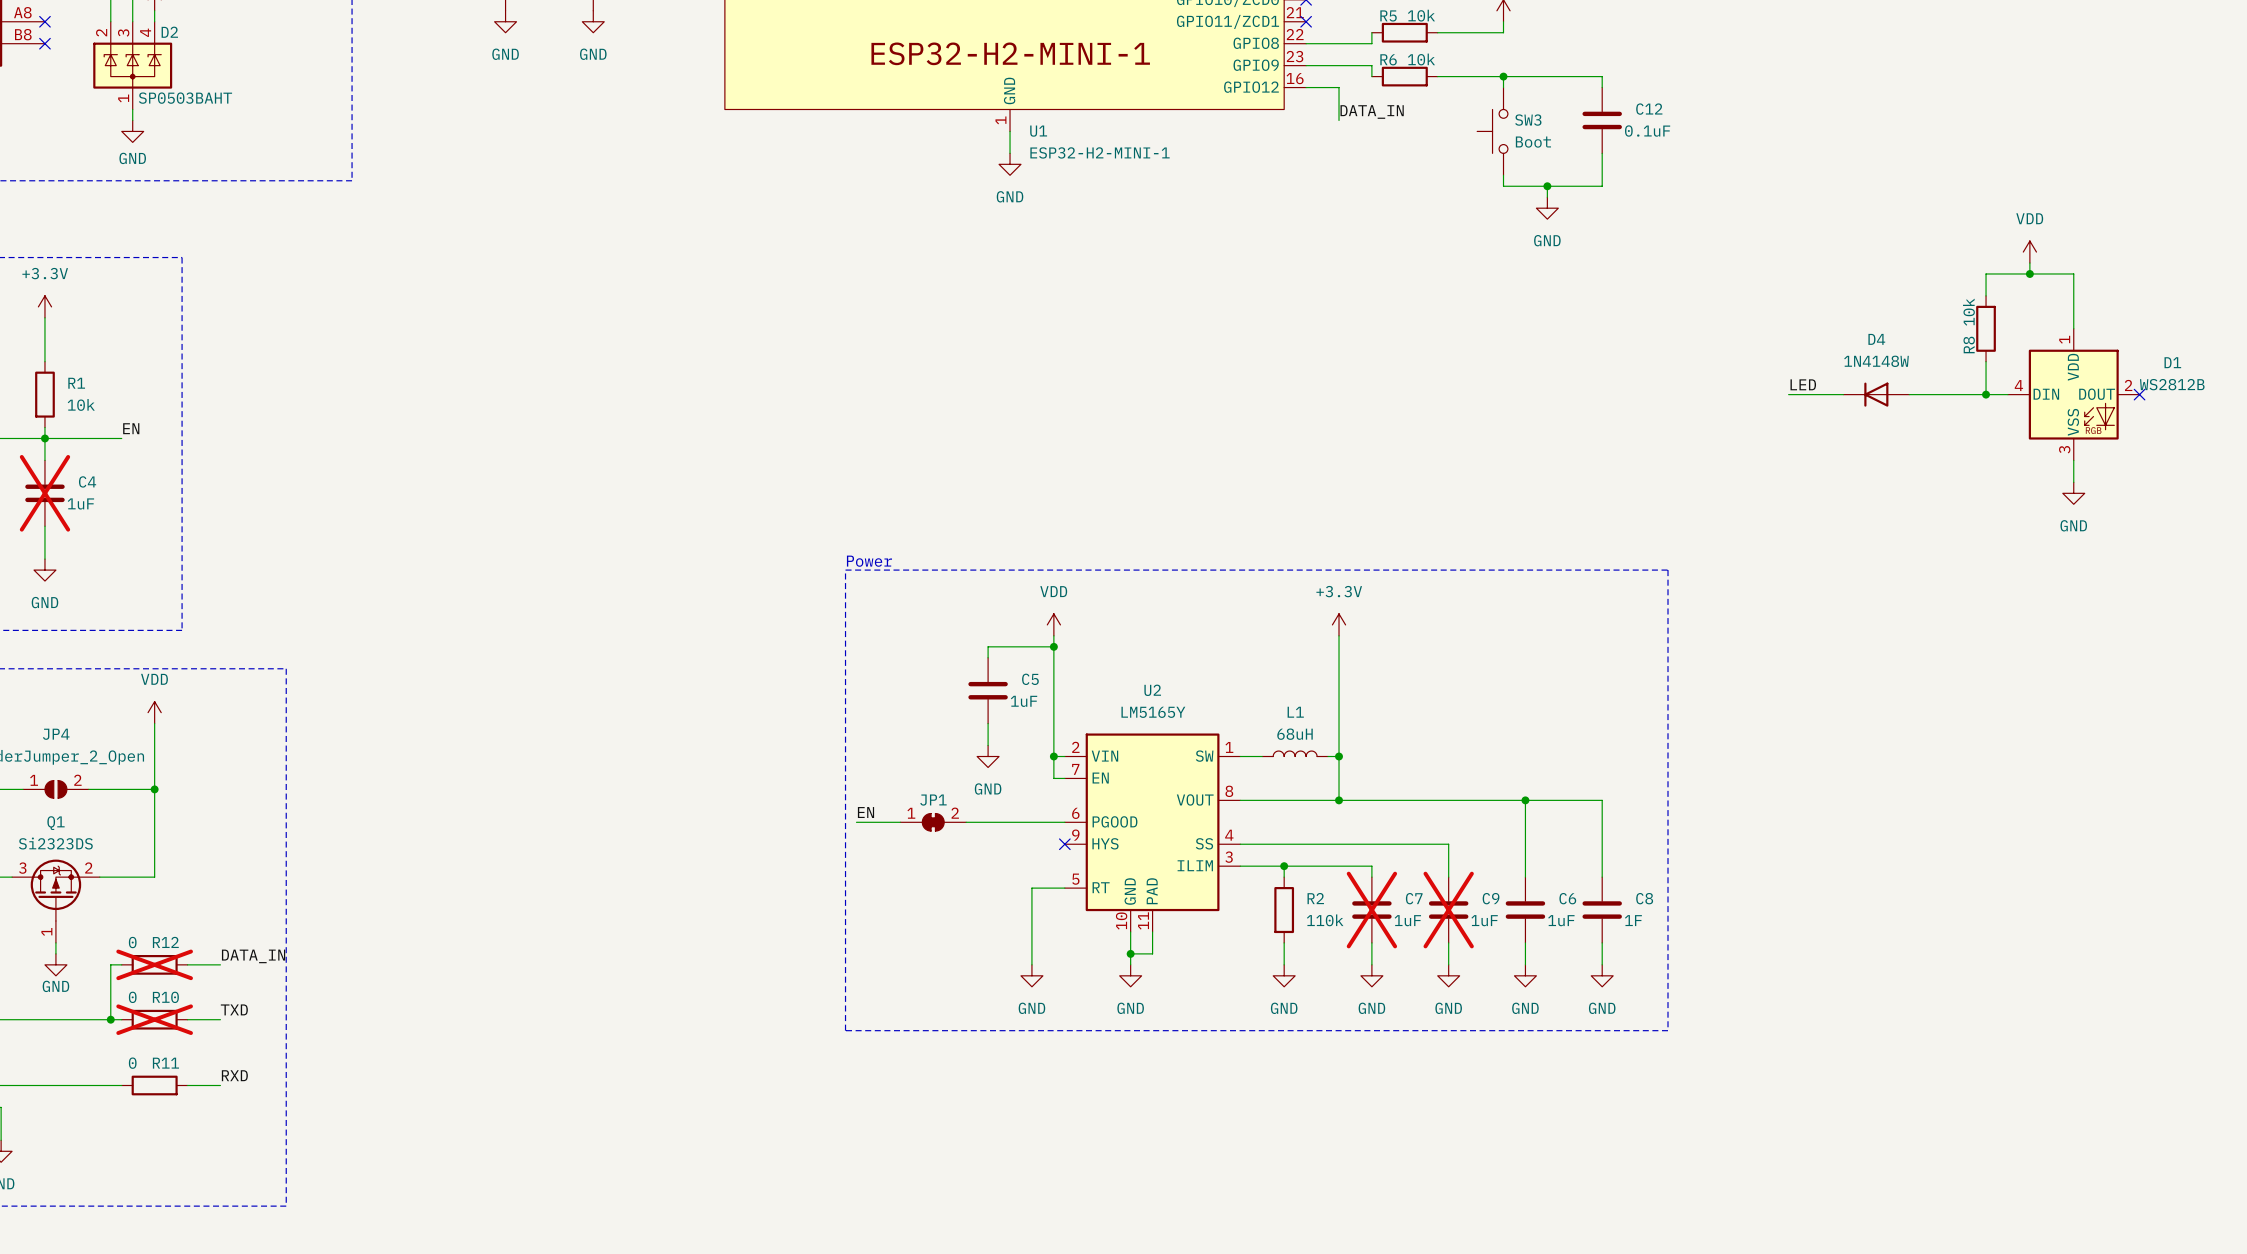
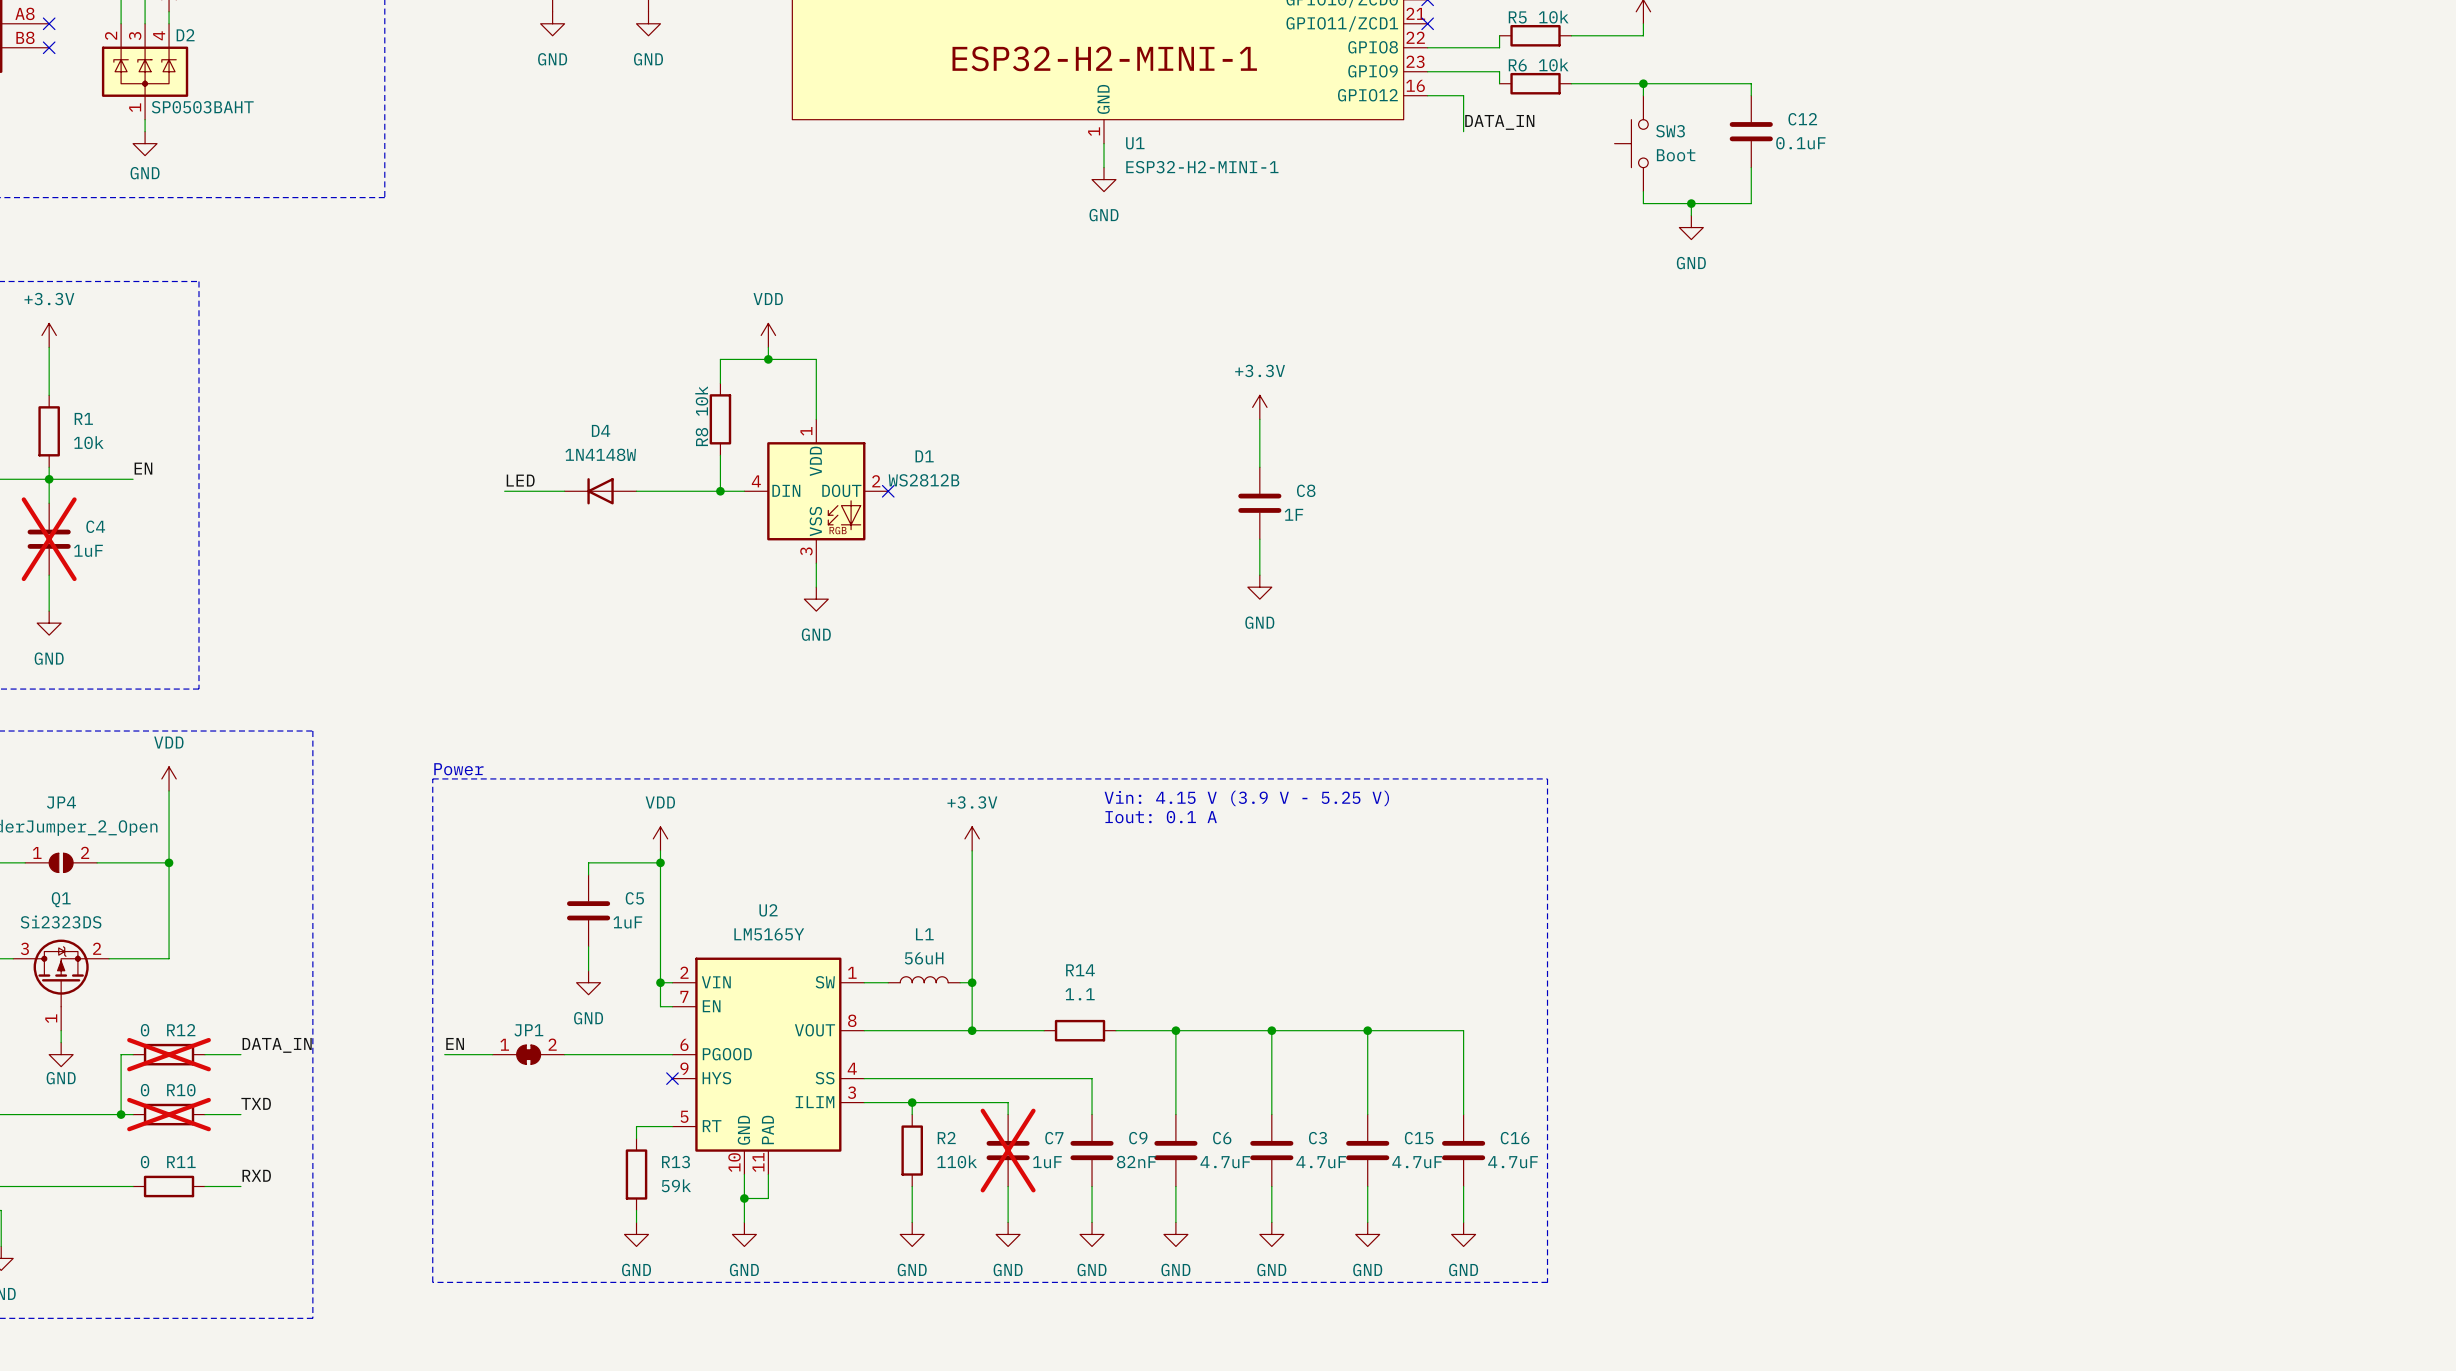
power symbol: VDD (2029, 252) -> none
wire: (2029, 263) (2029, 273) -> none
junction: (2029, 273) -> none
wire: (1986, 295) (1986, 273) (2073, 273) (2073, 328) -> none
power symbol: none -> VDD (768, 335)
wire: none -> (768, 347) (768, 359)
junction: none -> (768, 359)
R8 position: (1986, 328) -> (720, 419)
wire: none -> (720, 383) (720, 359) (816, 359) (816, 419)
wire: (1986, 361) (1986, 394) -> none
power symbol: none -> +3.3V (1259, 407)
wire: none -> (1259, 419) (1259, 467)
label: LED (1803, 384) -> none
wire: (1788, 394) (1843, 394) -> none
D4 position: (1876, 394) -> (600, 491)
wire: (1909, 394) (2007, 394) -> none
junction: (1986, 394) -> none
D1 position: (2073, 394) -> (816, 491)
no-connect mark: (2139, 394) -> none
wire: none -> (720, 455) (720, 491)
label: none -> LED (520, 480)
wire: none -> (504, 491) (564, 491)
wire: none -> (636, 491) (744, 491)
junction: none -> (720, 491)
no-connect mark: none -> (888, 491)
wire: (2073, 460) (2073, 482) -> none
wire: none -> (1259, 539) (1259, 575)
power symbol: GND (2073, 493) -> none
wire: none -> (816, 563) (816, 587)
power symbol: none -> GND (1259, 587)
power symbol: none -> GND (816, 599)
text: Power (869, 561) -> none
line: (845, 570) (1668, 570) (1668, 1030) (845, 1030) (845, 570) -> none
power symbol: VDD (1053, 624) -> none
power symbol: +3.3V (1339, 624) -> none
wire: (1053, 635) (1053, 778) (1064, 778) -> none
wire: (1339, 635) (1339, 800) -> none
wire: (1053, 646) (988, 646) (988, 657) -> none
junction: (1053, 646) -> none
C5 position: (988, 690) -> (588, 910)
text: none -> Power (458, 769)
line: none -> (432, 778) (1547, 778) (1547, 1282) (432, 1282) (432, 778)
wire: (988, 723) (988, 745) -> none
text: none -> Vin: 4.15 V (3.9 V - 5.25 V) (1246, 798)
L1 value: 68uH (1295, 734) -> 56uH (924, 958)
text: none -> Iout: 0.1 A (1161, 817)
L1 position: (1295, 753) -> (924, 979)
power symbol: GND (988, 756) -> none
wire: (1053, 756) (1064, 756) -> none
junction: (1053, 756) -> none
wire: (1240, 756) (1262, 756) -> none
wire: (1328, 756) (1339, 756) -> none
junction: (1339, 756) -> none
power symbol: none -> VDD (660, 838)
power symbol: none -> +3.3V (972, 838)
wire: none -> (660, 850) (660, 1006) (672, 1006)
wire: none -> (972, 850) (972, 1030)
wire: none -> (660, 862) (588, 862) (588, 874)
junction: none -> (660, 862)
wire: (1240, 800) (1602, 800) (1602, 877) -> none
junction: (1339, 800) -> none
wire: (1525, 800) (1525, 877) -> none
junction: (1525, 800) -> none
label: EN (865, 812) -> none
wire: (856, 822) (900, 822) -> none
JP1 position: (933, 822) -> (528, 1054)
wire: (966, 822) (1064, 822) -> none
U2 position: (1152, 832) -> (768, 1066)
no-connect mark: (1064, 844) -> none
wire: (1240, 844) (1448, 844) (1448, 877) -> none
wire: none -> (588, 946) (588, 970)
wire: (1240, 866) (1371, 866) (1371, 877) -> none
wire: (1284, 866) (1284, 877) -> none
junction: (1284, 866) -> none
wire: (1064, 888) (1031, 888) (1031, 964) -> none
power symbol: none -> GND (588, 982)
wire: none -> (660, 982) (672, 982)
junction: none -> (660, 982)
wire: none -> (864, 982) (888, 982)
wire: none -> (960, 982) (972, 982)
junction: none -> (972, 982)
R2 position: (1284, 910) -> (912, 1150)
C7 position: (1371, 910) -> (1008, 1150)
C9 position: (1448, 910) -> (1092, 1150)
C9 do-not-place cross: (1448, 910) -> none
C6 position: (1525, 910) -> (1175, 1150)
C8 position: (1602, 910) -> (1259, 503)
C9 value: 1uF (1484, 920) -> 82nF (1136, 1162)
C6 value: 1uF (1561, 920) -> 4.7uF (1225, 1162)
wire: (1130, 931) (1130, 964) -> (1271, 1186) (1271, 1222)
wire: (1152, 931) (1152, 953) (1130, 953) -> none
wire: none -> (864, 1030) (1044, 1030)
junction: none -> (972, 1030)
R14: none -> 1.1 (1080, 1030)
wire: none -> (1115, 1030) (1463, 1030) (1463, 1114)
wire: none -> (1175, 1030) (1175, 1114)
junction: none -> (1175, 1030)
wire: none -> (1271, 1030) (1271, 1114)
junction: none -> (1271, 1030)
wire: none -> (1367, 1030) (1367, 1114)
junction: none -> (1367, 1030)
wire: (1284, 942) (1284, 964) -> none
wire: (1371, 942) (1371, 964) -> none
wire: (1448, 942) (1448, 964) -> none
wire: (1525, 942) (1525, 964) -> none
wire: (1602, 942) (1602, 964) -> none
junction: (1130, 953) -> none
label: none -> EN (455, 1043)
wire: none -> (444, 1054) (492, 1054)
wire: none -> (564, 1054) (672, 1054)
power symbol: GND (1031, 975) -> none
power symbol: GND (1130, 975) -> none
power symbol: GND (1284, 975) -> none
power symbol: GND (1371, 975) -> none
power symbol: GND (1448, 975) -> none
power symbol: GND (1525, 975) -> none
power symbol: GND (1602, 975) -> none
no-connect mark: none -> (672, 1078)
wire: none -> (864, 1078) (1092, 1078) (1092, 1114)
wire: none -> (864, 1102) (1008, 1102) (1008, 1114)
wire: none -> (912, 1102) (912, 1114)
junction: none -> (912, 1102)
wire: none -> (672, 1126) (636, 1126) (636, 1138)
C3: none -> 4.7uF (1271, 1150)
C15: none -> 4.7uF (1367, 1150)
C16: none -> 4.7uF (1463, 1150)
R13: none -> 59k (636, 1174)
wire: none -> (744, 1174) (744, 1222)
wire: none -> (768, 1174) (768, 1198) (744, 1198)
wire: none -> (912, 1186) (912, 1222)
wire: none -> (1008, 1186) (1008, 1222)
wire: none -> (1092, 1186) (1092, 1222)
wire: none -> (1175, 1186) (1175, 1222)
wire: none -> (1367, 1186) (1367, 1222)
wire: none -> (1463, 1186) (1463, 1222)
junction: none -> (744, 1198)
wire: none -> (636, 1210) (636, 1222)
power symbol: none -> GND (636, 1234)
power symbol: none -> GND (744, 1234)
power symbol: none -> GND (912, 1234)
power symbol: none -> GND (1008, 1234)
power symbol: none -> GND (1092, 1234)
power symbol: none -> GND (1175, 1234)
power symbol: none -> GND (1271, 1234)
power symbol: none -> GND (1367, 1234)
power symbol: none -> GND (1463, 1234)

